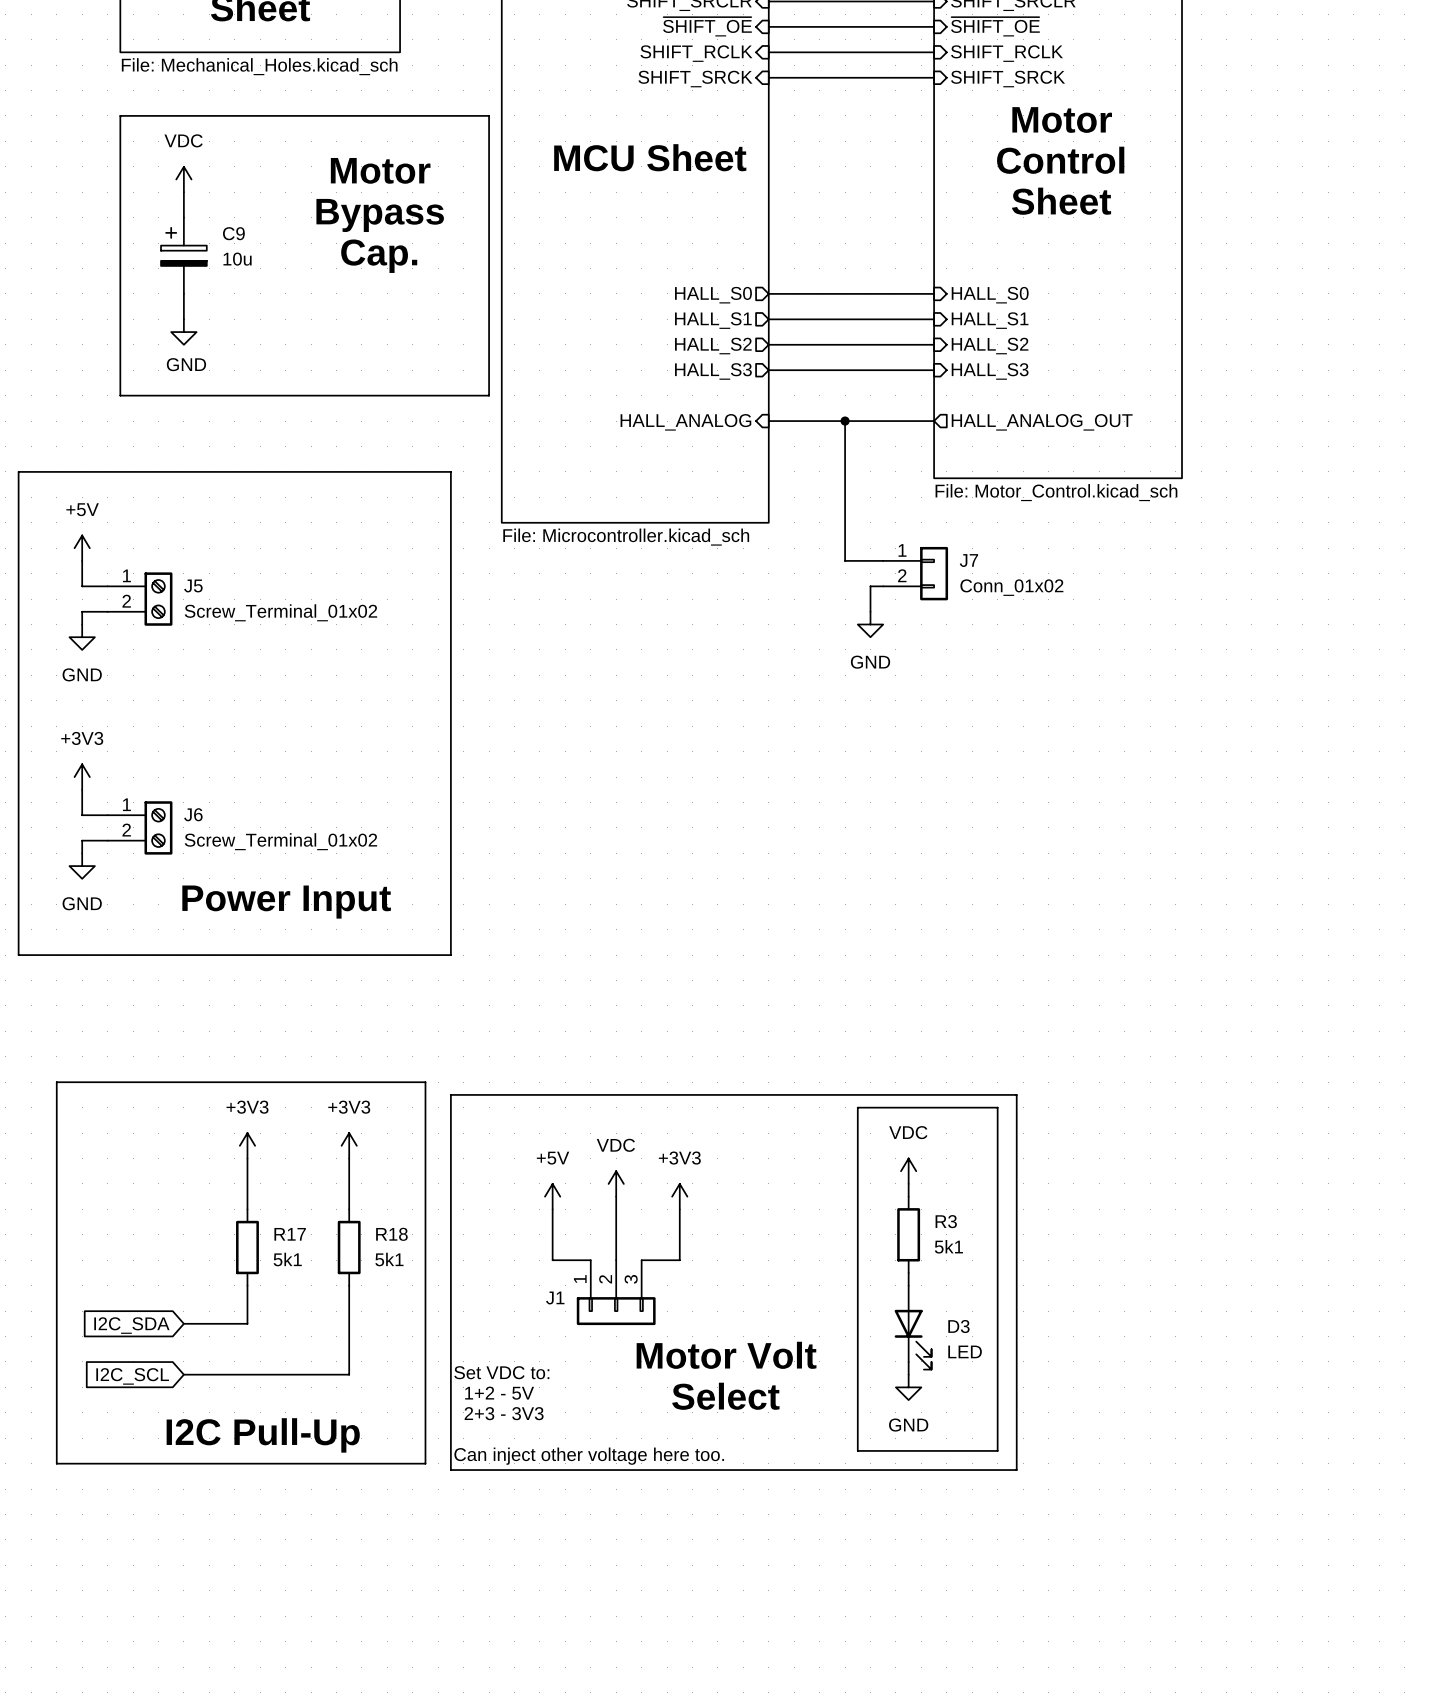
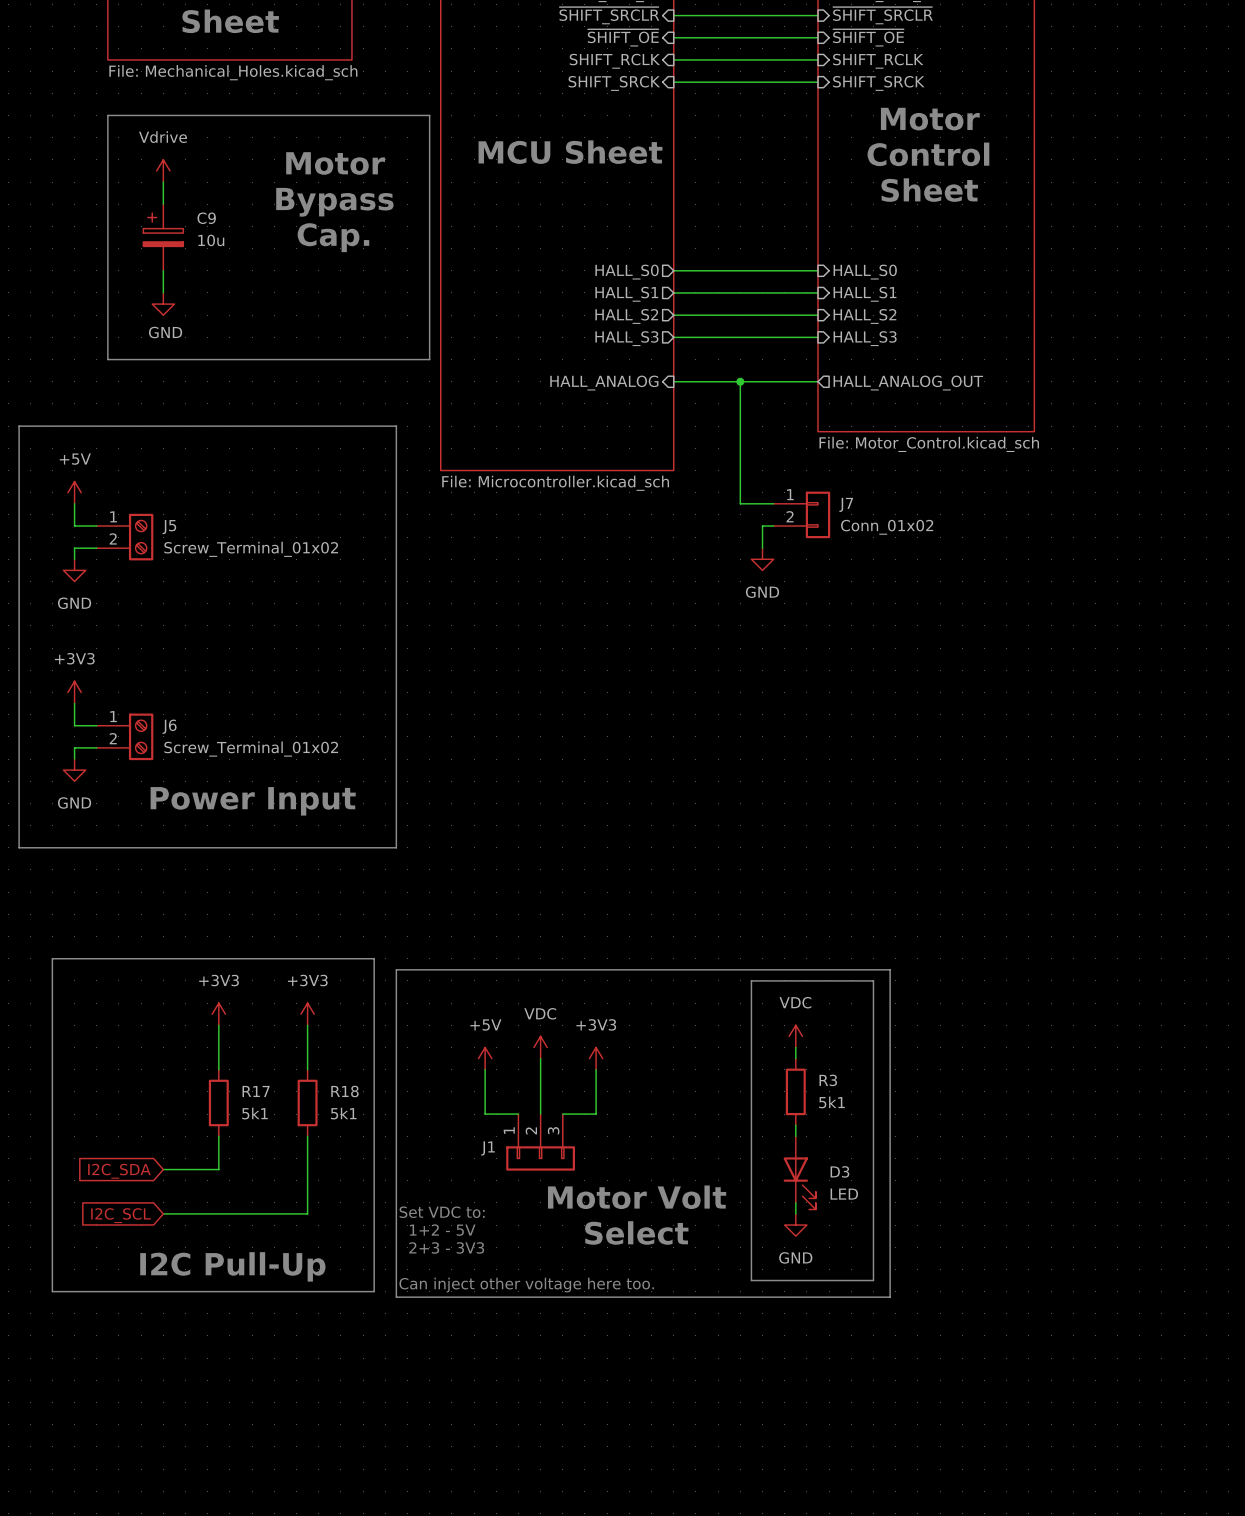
power symbol: VDC (183, 179) -> Vdrive (163, 170)

